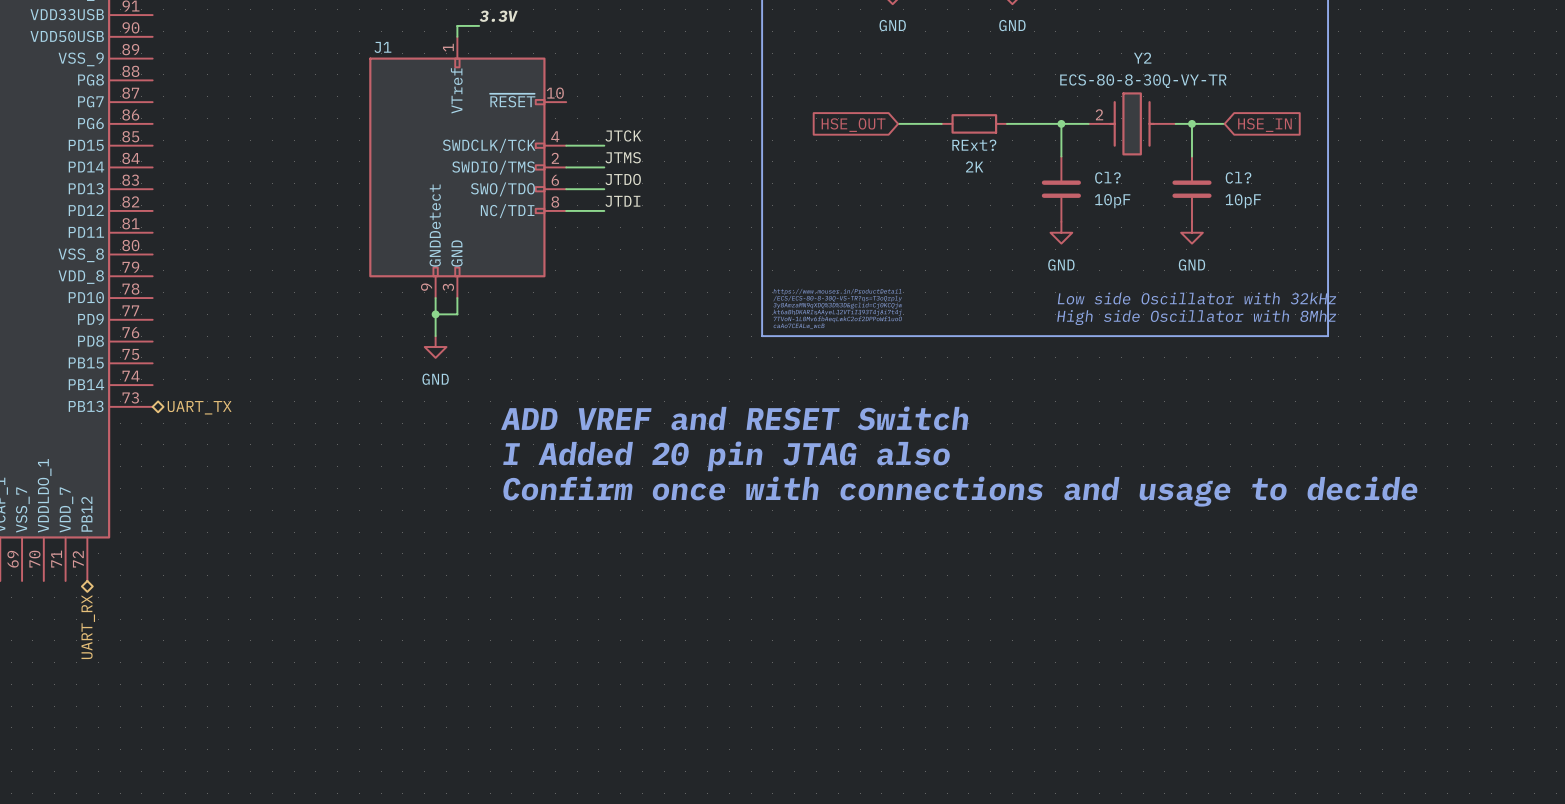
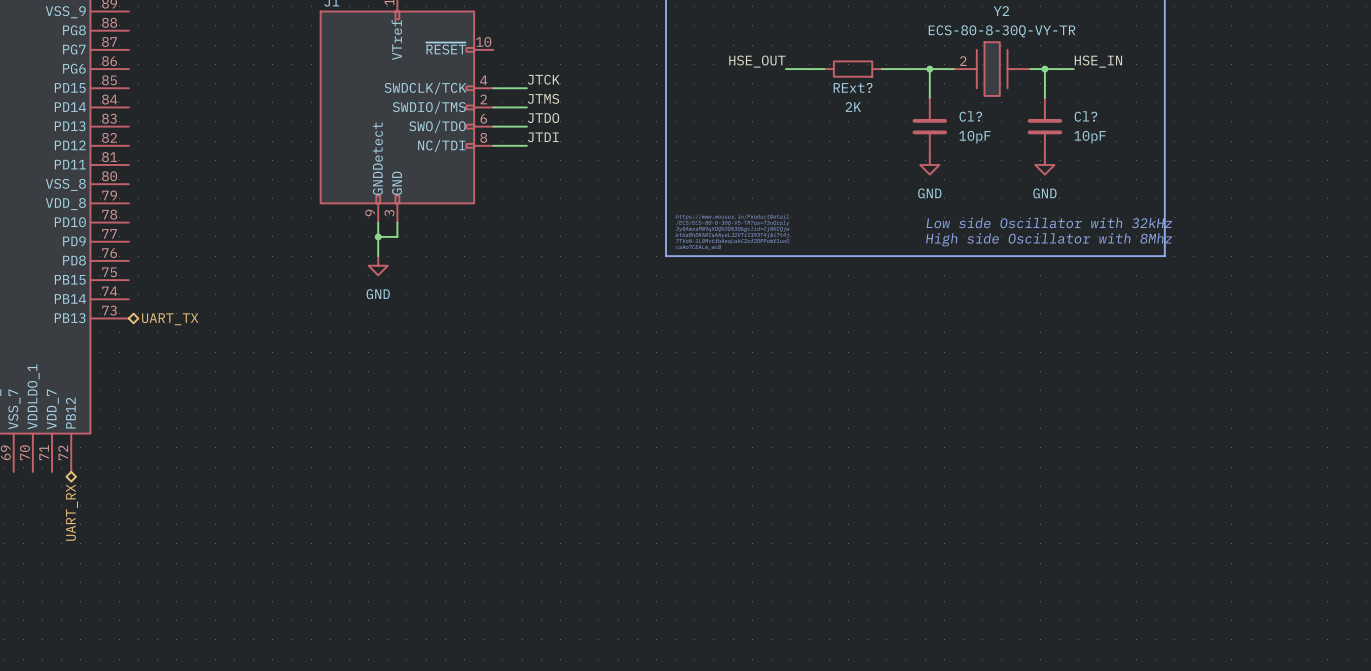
label: none -> HSE_OUT (757, 61)
label: none -> HSE_IN (1098, 61)
global label: HSE_OUT (853, 125) -> none
global label: HSE_IN (1264, 125) -> none
text: ADD VREF and RESET Switch (734, 418) -> none
text: I Added 20 pin JTAG also (726, 456) -> none
text: Confirm once with connections and usage to decide (960, 491) -> none

